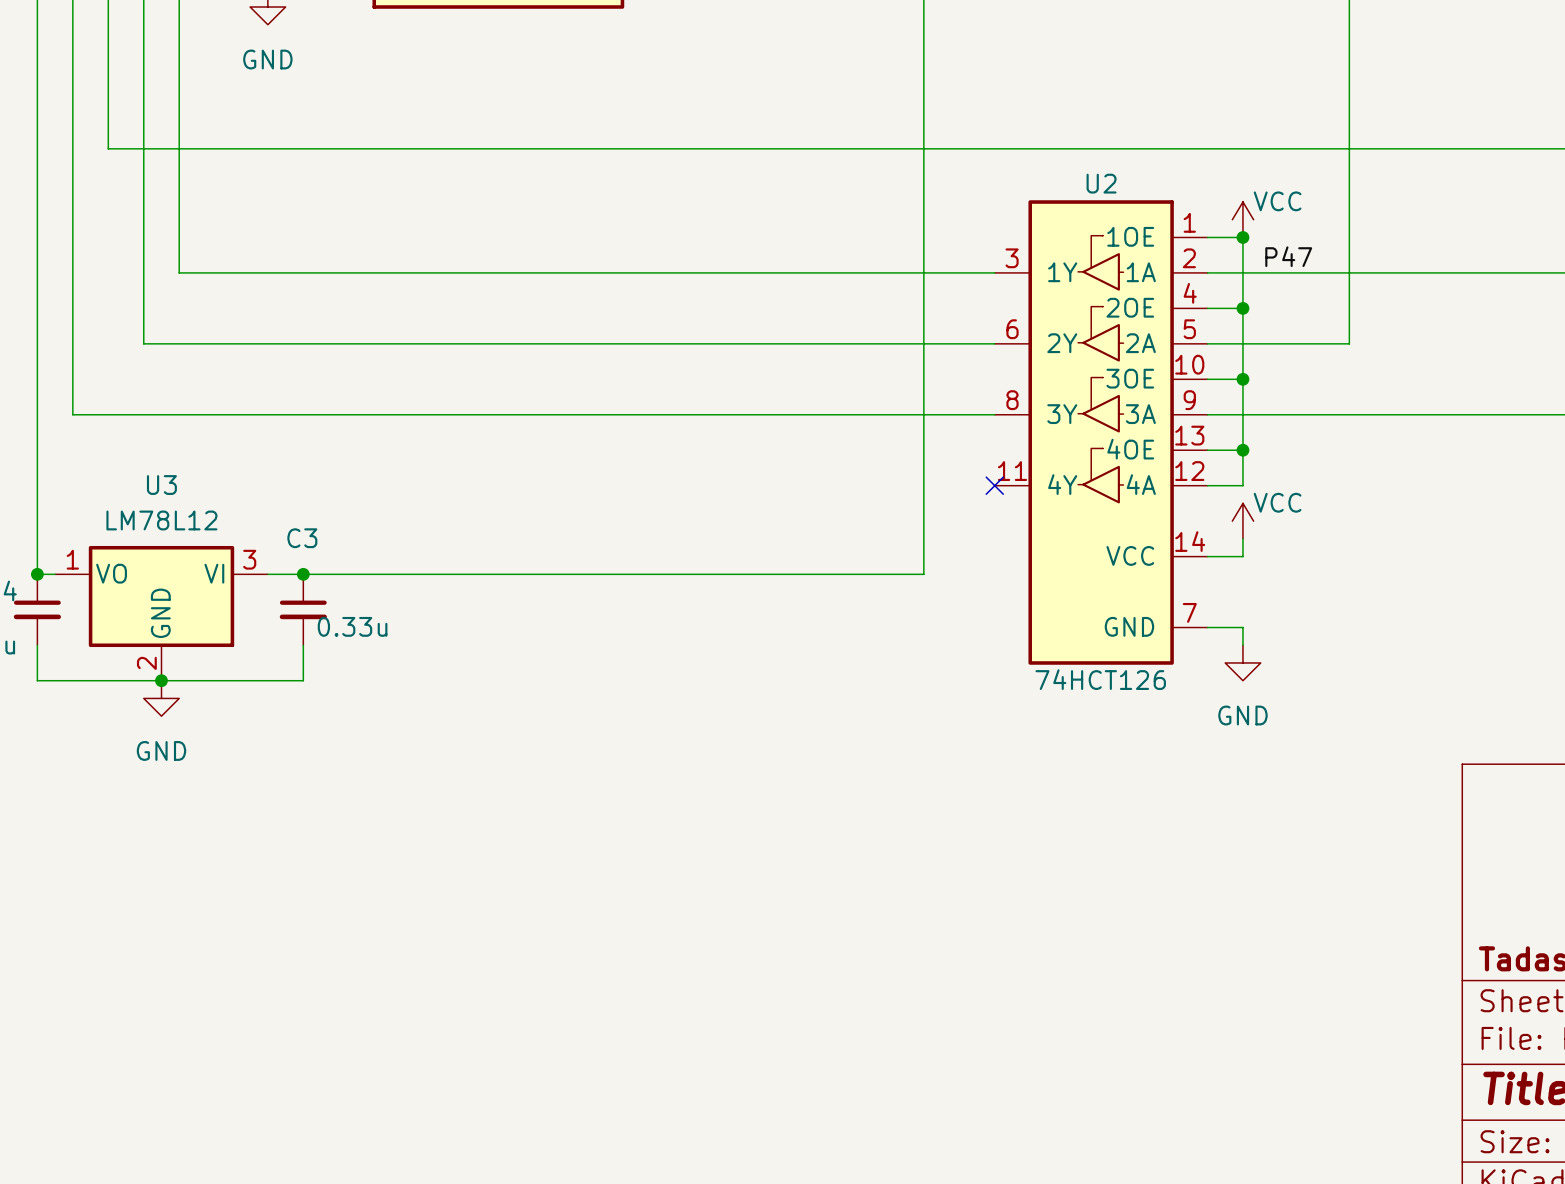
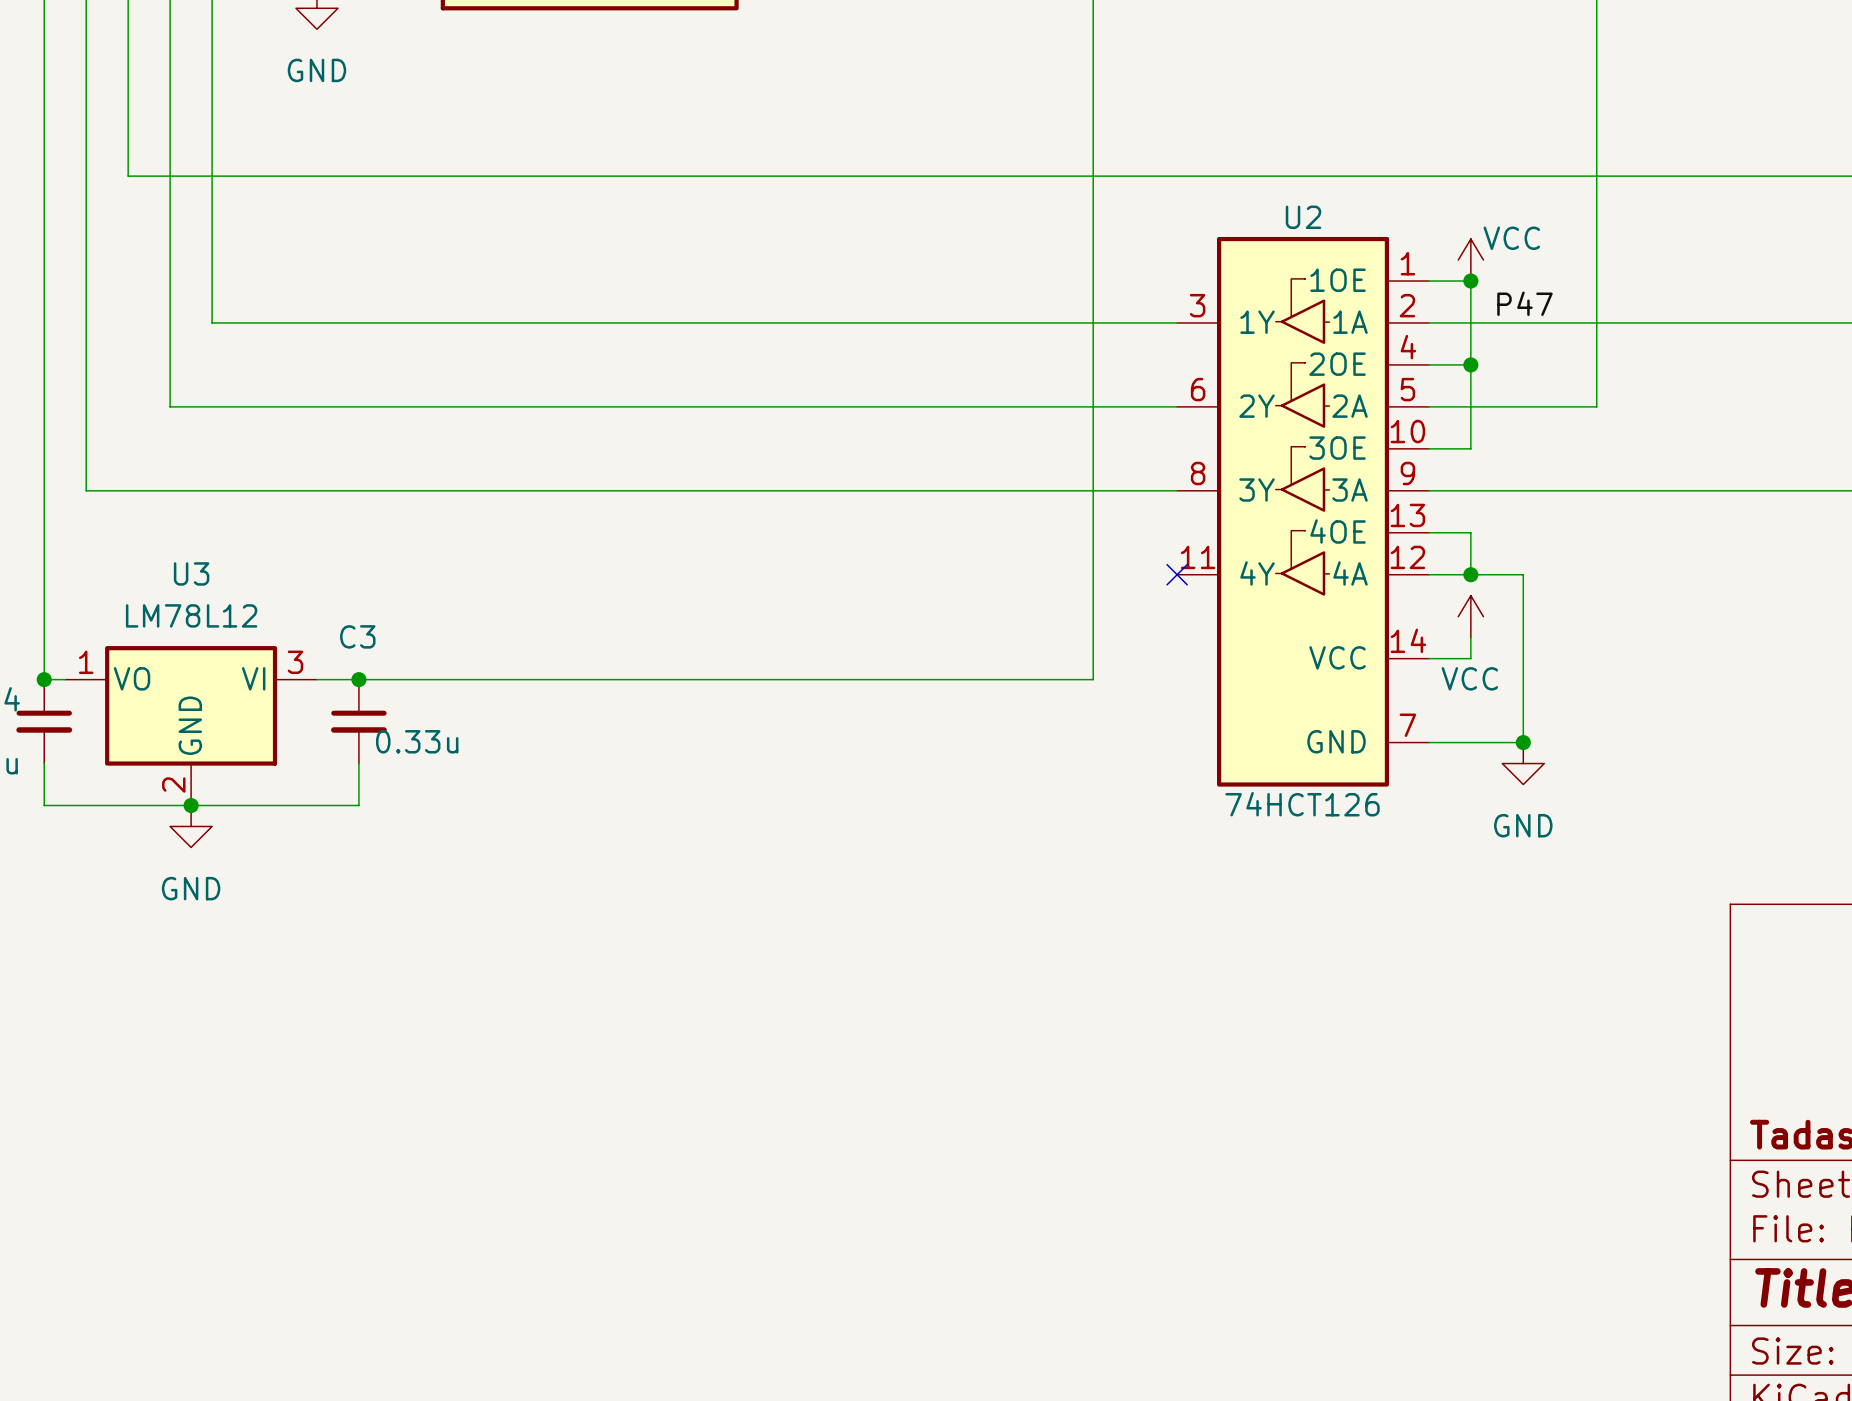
wire: (1242, 379) (1242, 450) -> none
junction: (1242, 379) -> none
junction position: (1242, 450) -> (1470, 574)
power symbol text position: VCC (1277, 502) -> VCC (1469, 678)
wire: (1242, 627) (1242, 645) -> (1470, 742) (1523, 742) (1523, 574) (1470, 574)
junction: none -> (1523, 742)
power symbol position: GND (1242, 662) -> GND (1523, 763)

